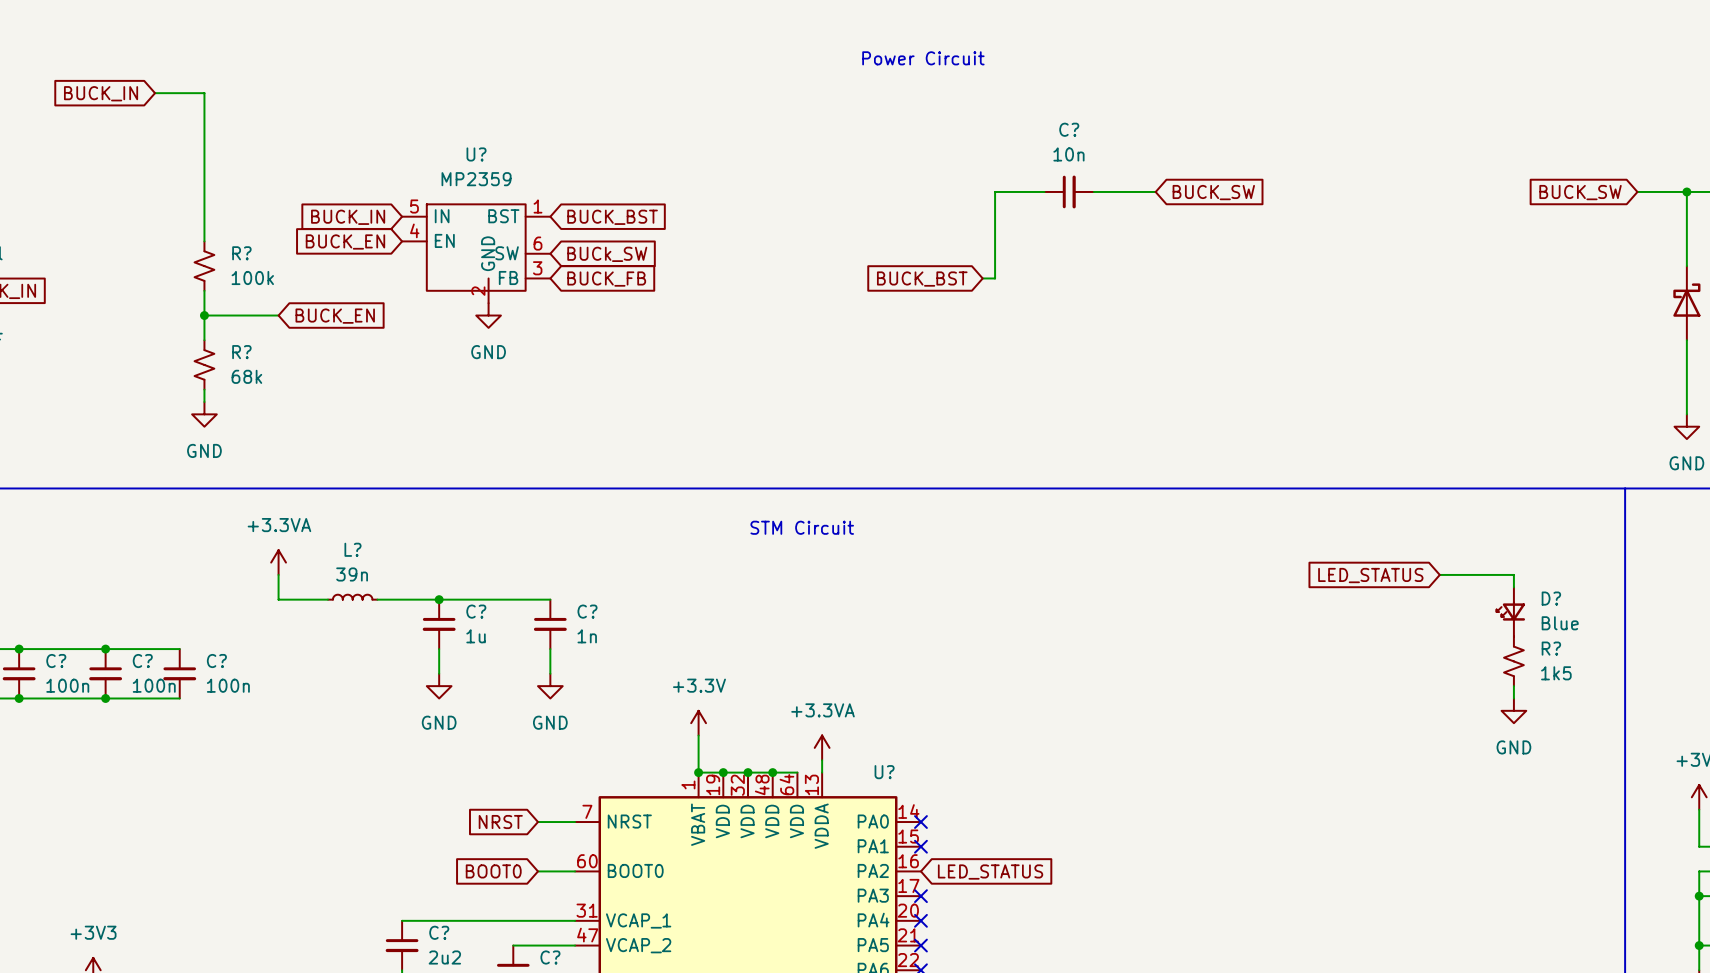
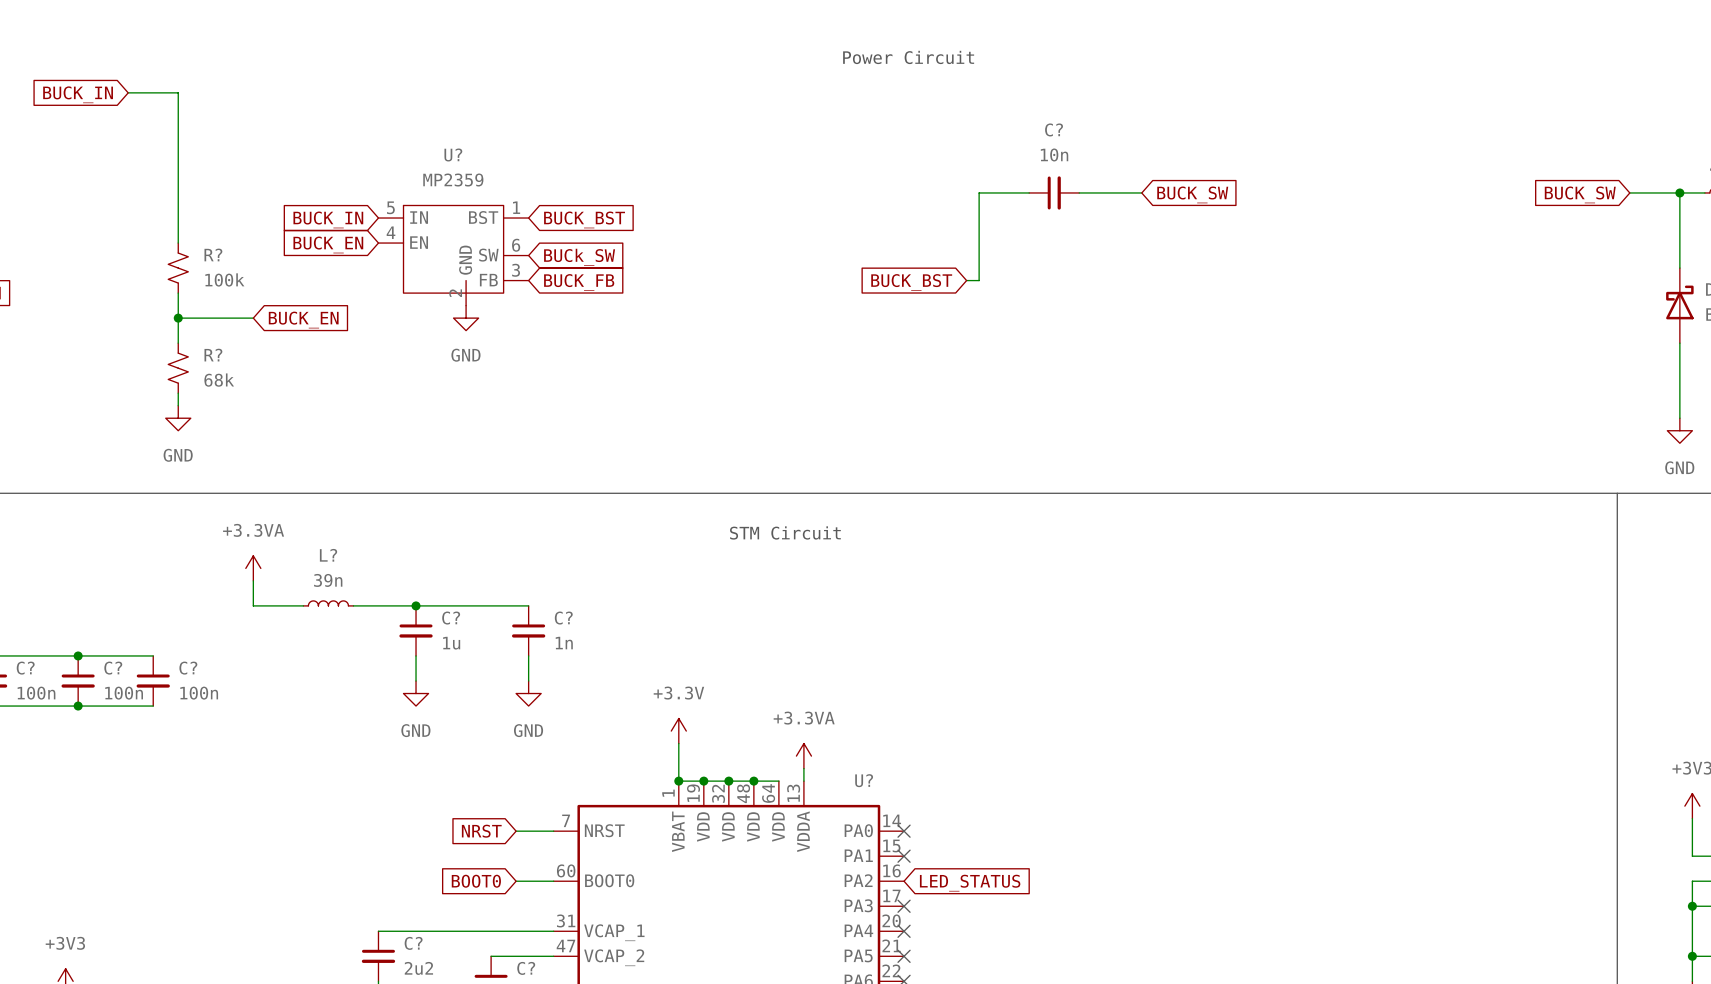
wire: (1439, 574) (1513, 574) (1513, 587) -> none
global label: LED_STATUS (1370, 575) -> none
D?: Blue (1510, 612) -> none
R?: 1k5 (1513, 661) -> none
wire: (1513, 686) (1513, 698) -> none
power symbol: GND (1513, 710) -> none

